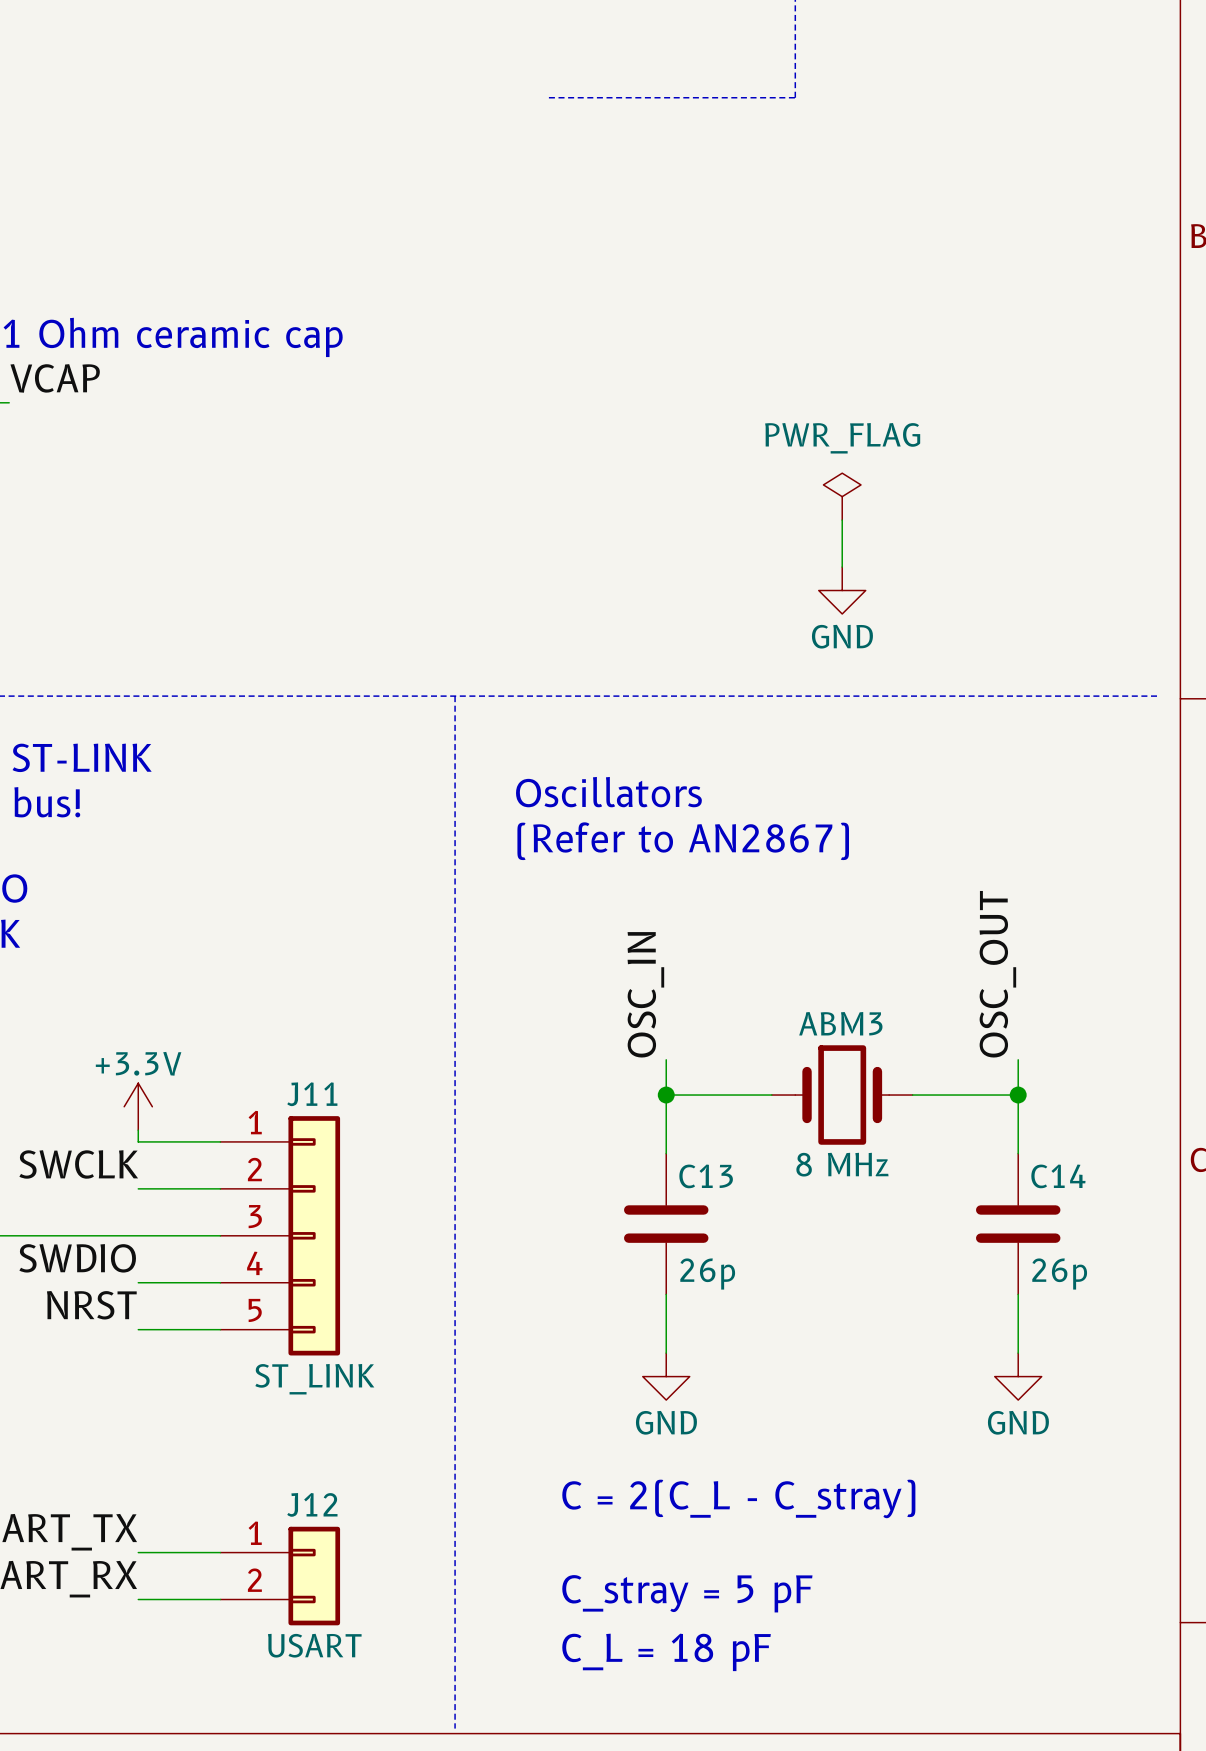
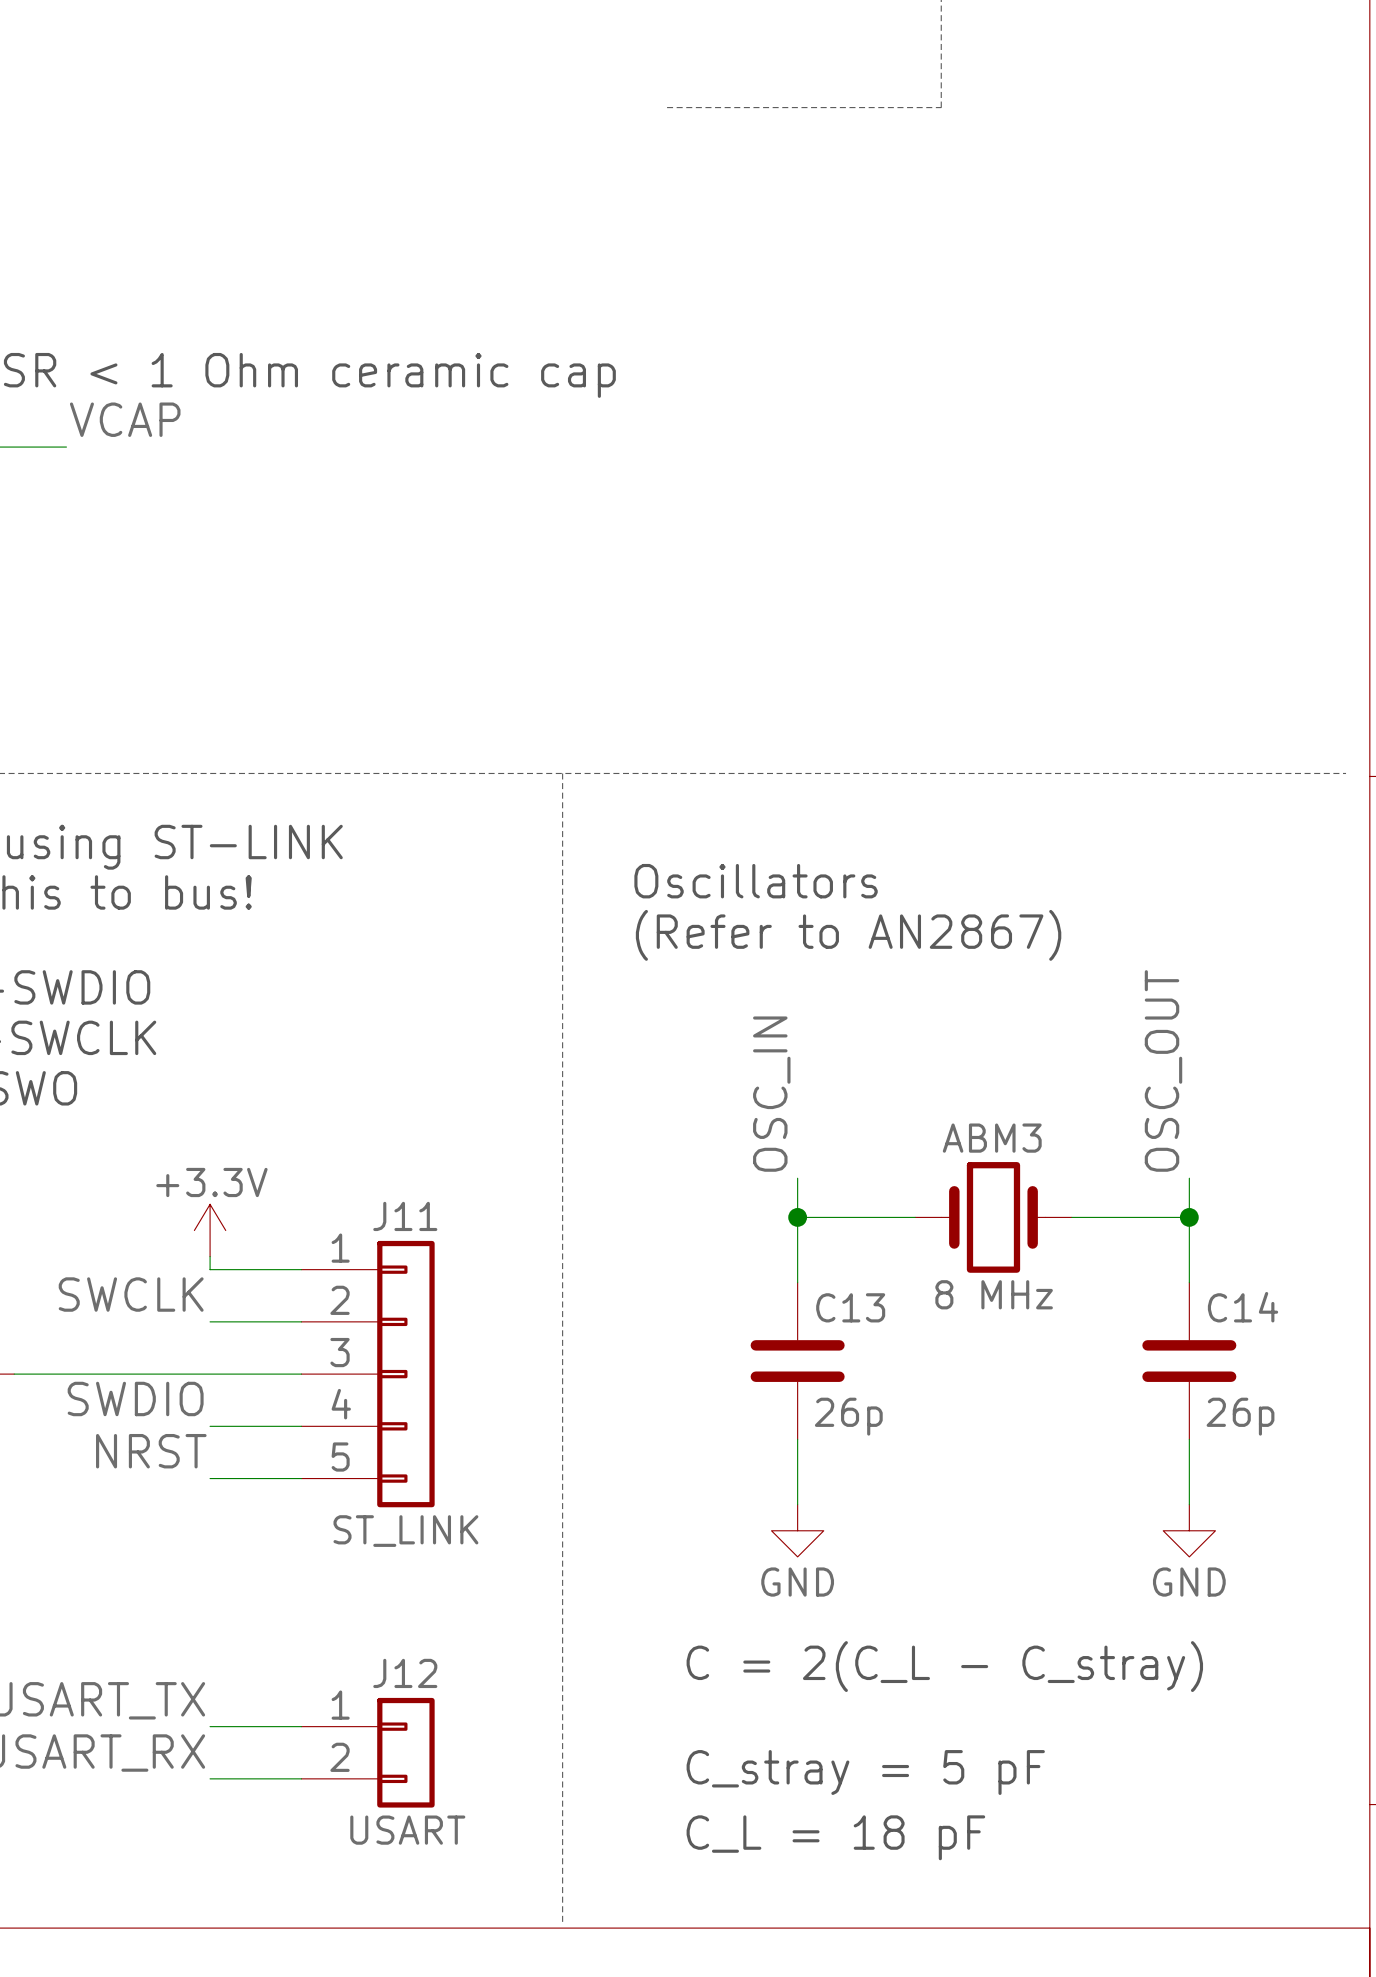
power symbol: PWR_FLAG (842, 496) -> none
wire: (842, 520) (842, 567) -> none
power symbol: GND (842, 590) -> none

